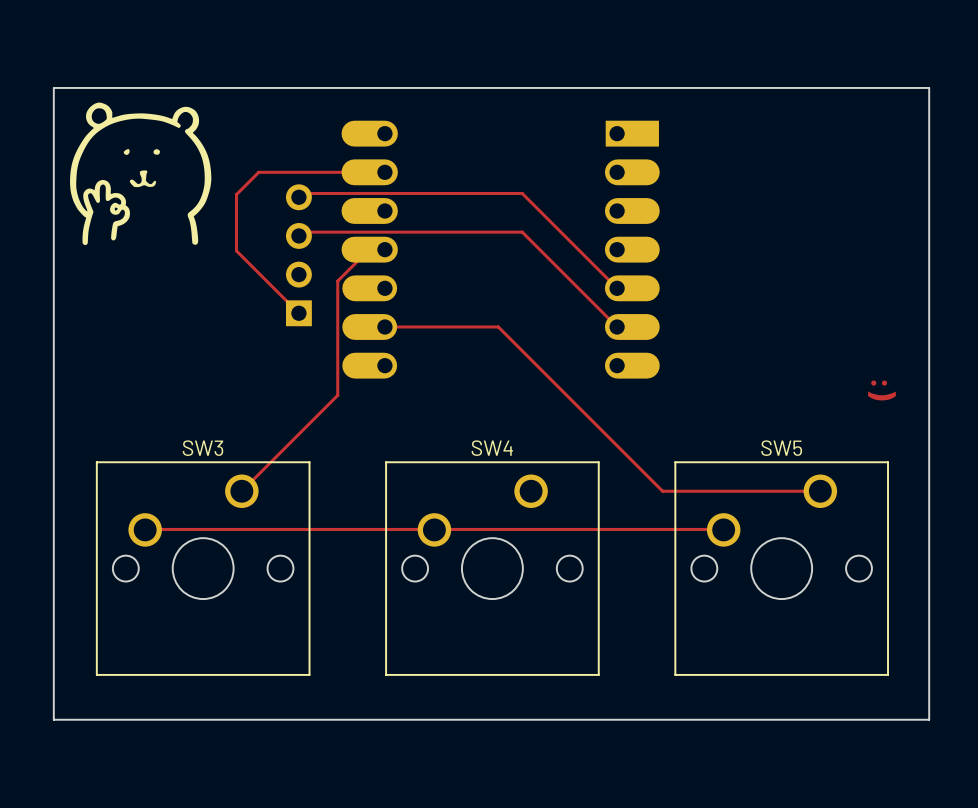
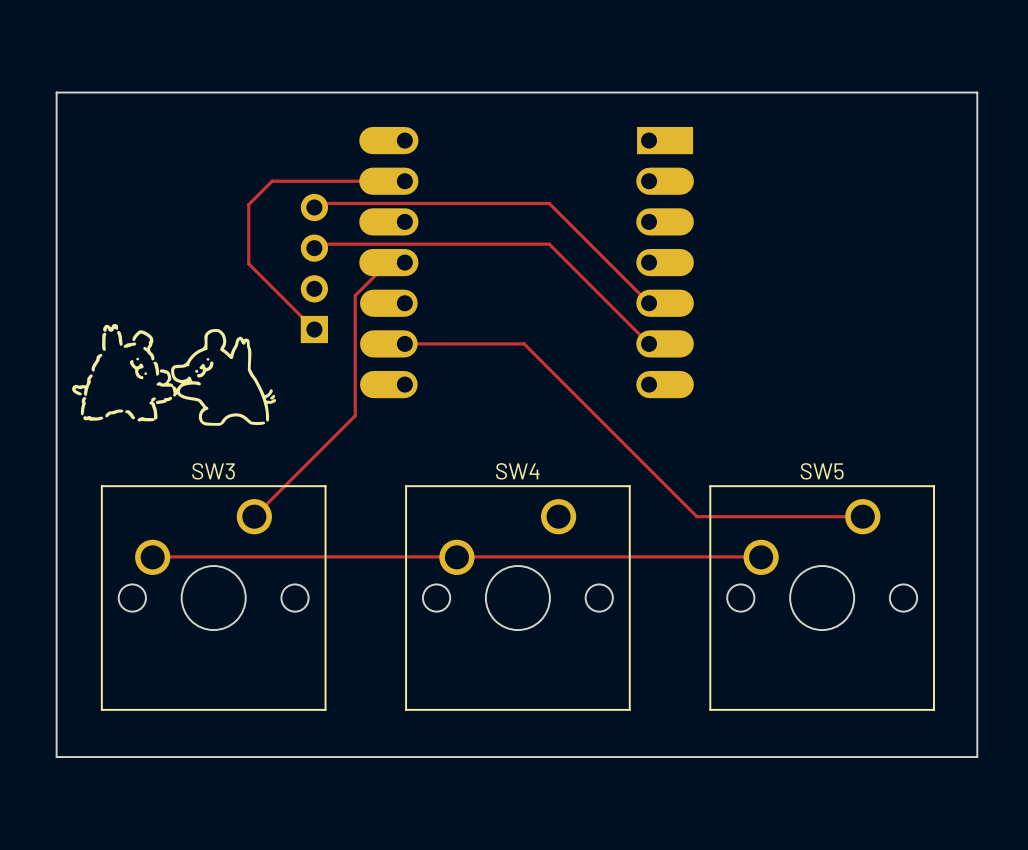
drawing: [70, 102, 212, 246] -> none
drawing: none -> [72, 324, 277, 426]
text: :) (881, 390) -> none

